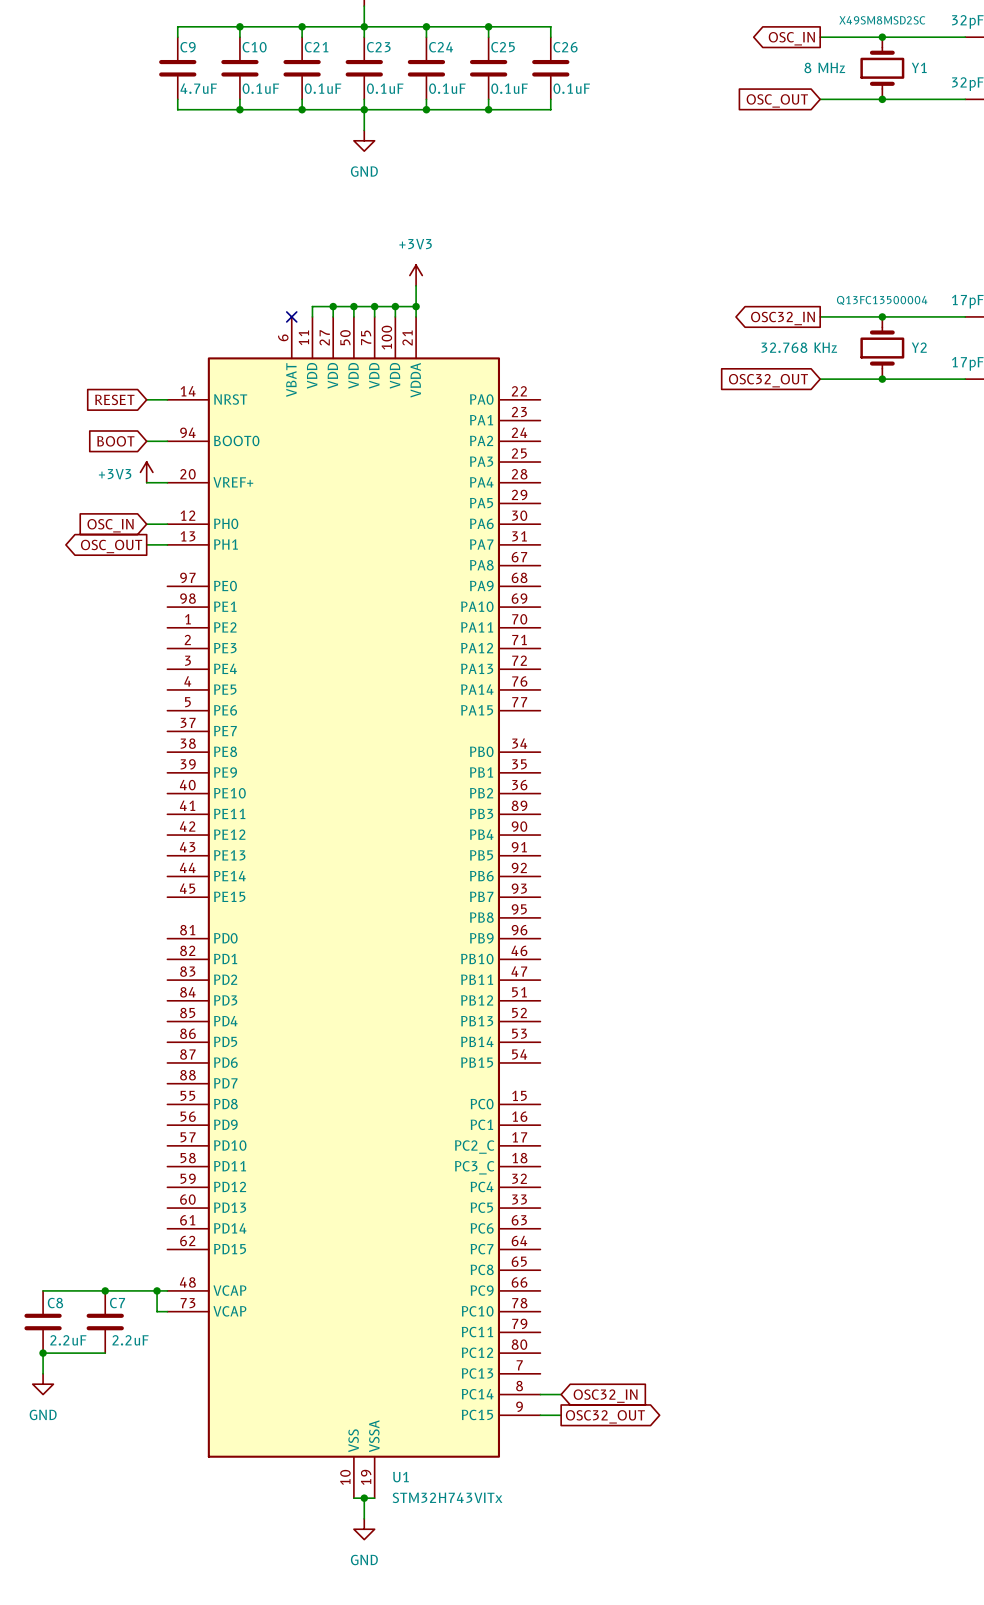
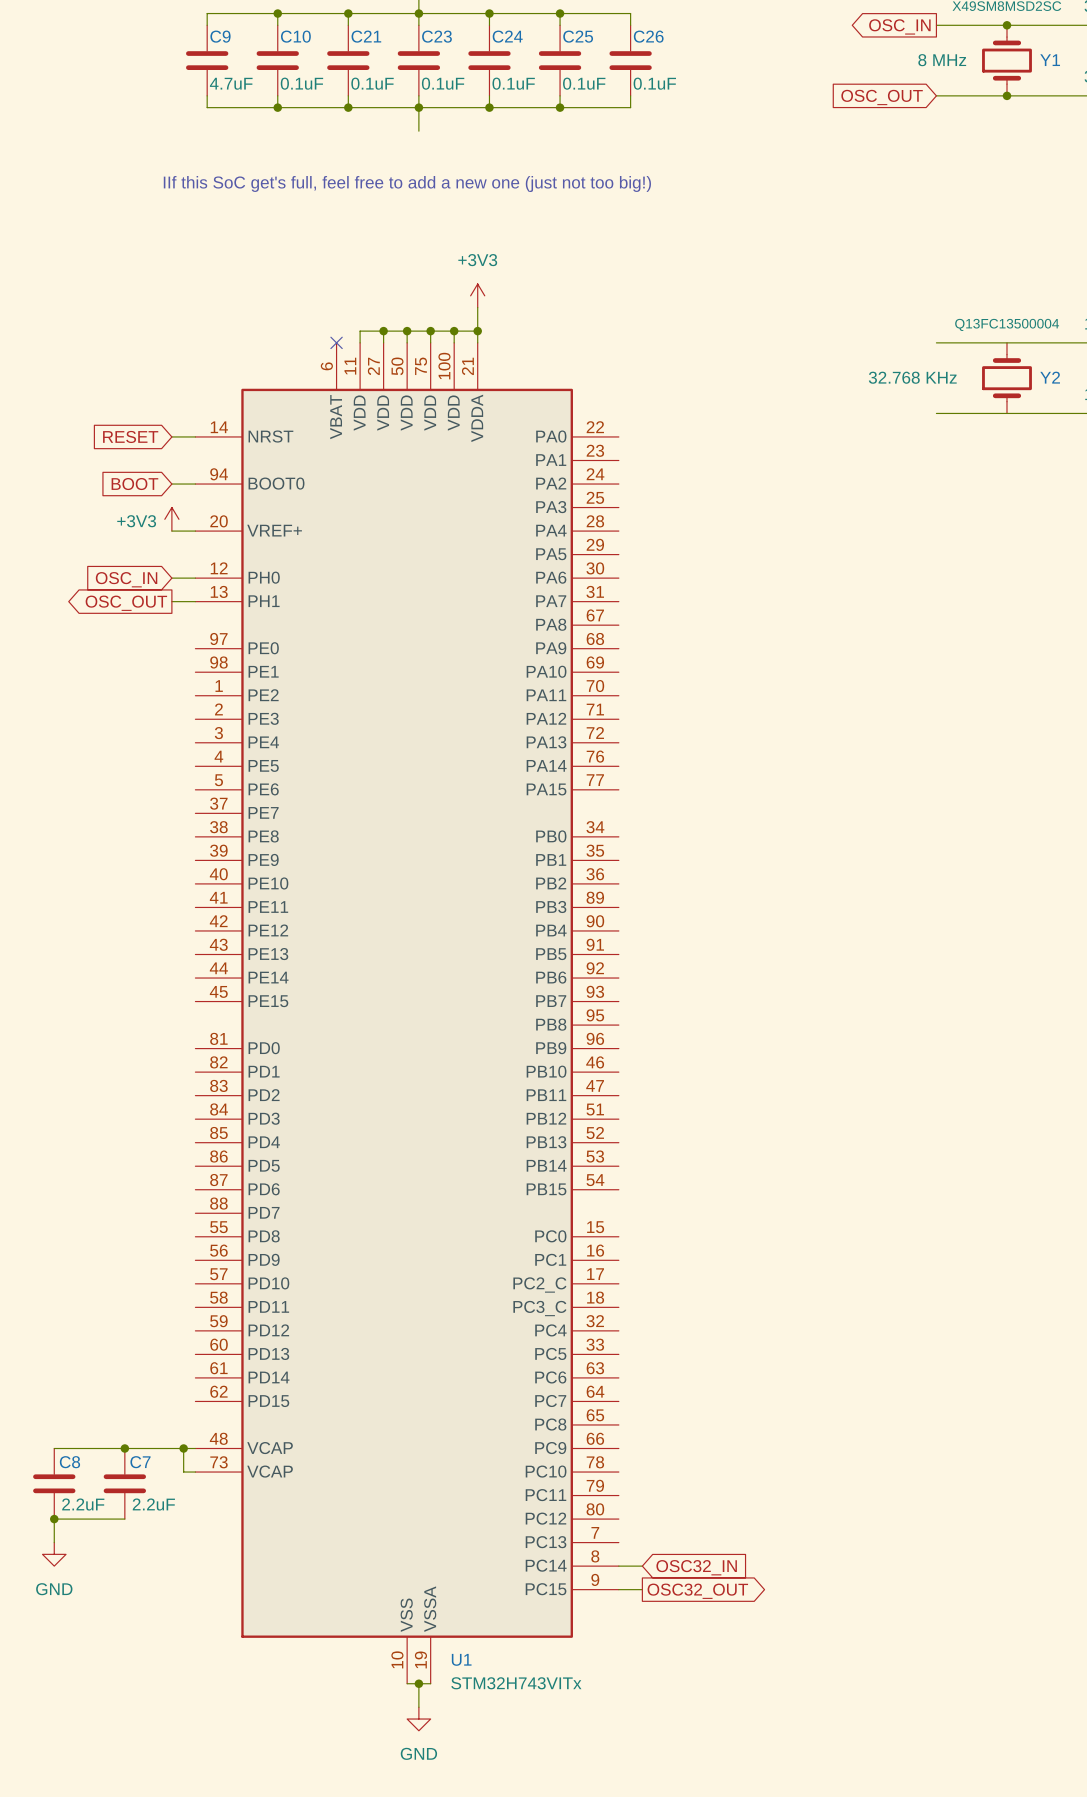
power symbol: GND (364, 140) -> none
text: none -> IIf this SoC get's full, feel free to add a new one (just not too big!) (407, 183)
junction: (882, 316) -> none
global label: OSC32_IN (782, 318) -> none
junction: (882, 379) -> none
global label: OSC32_OUT (768, 380) -> none

